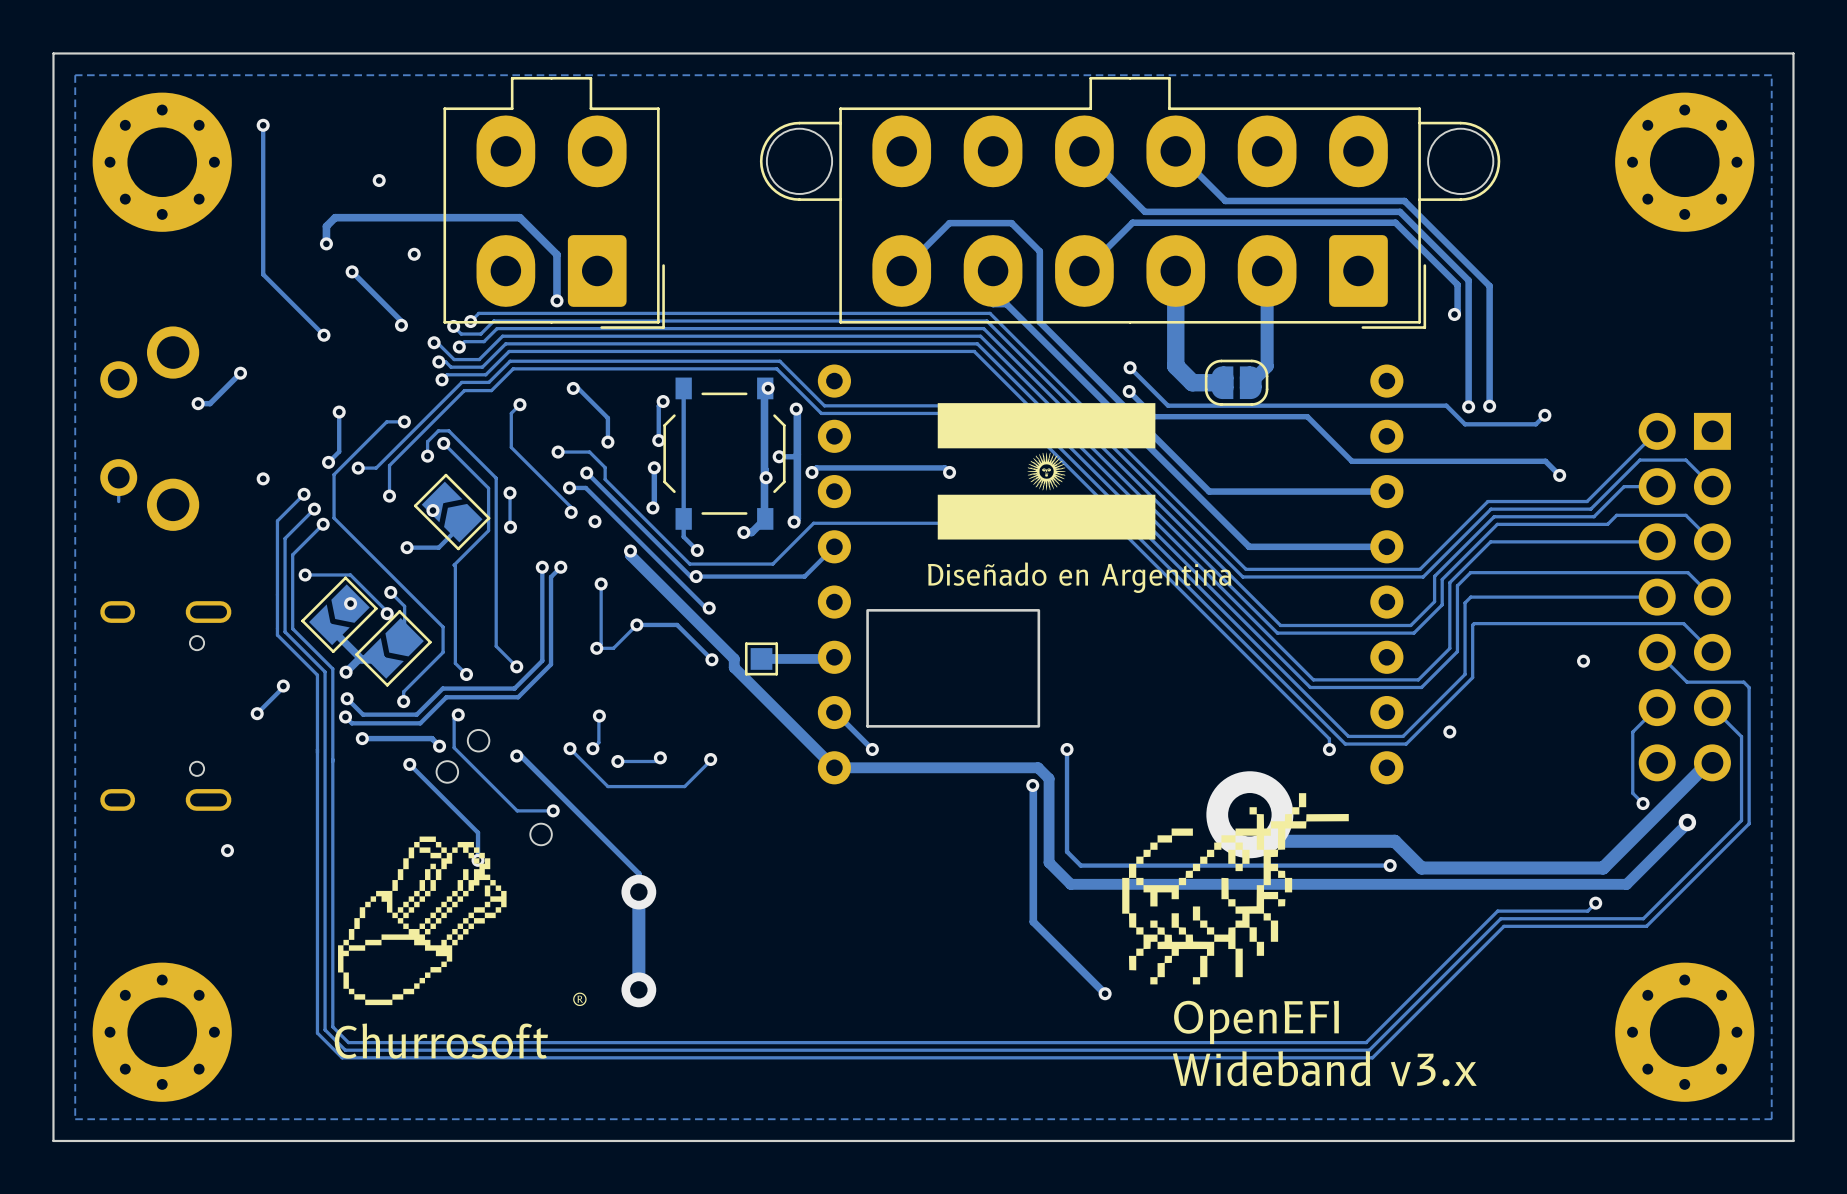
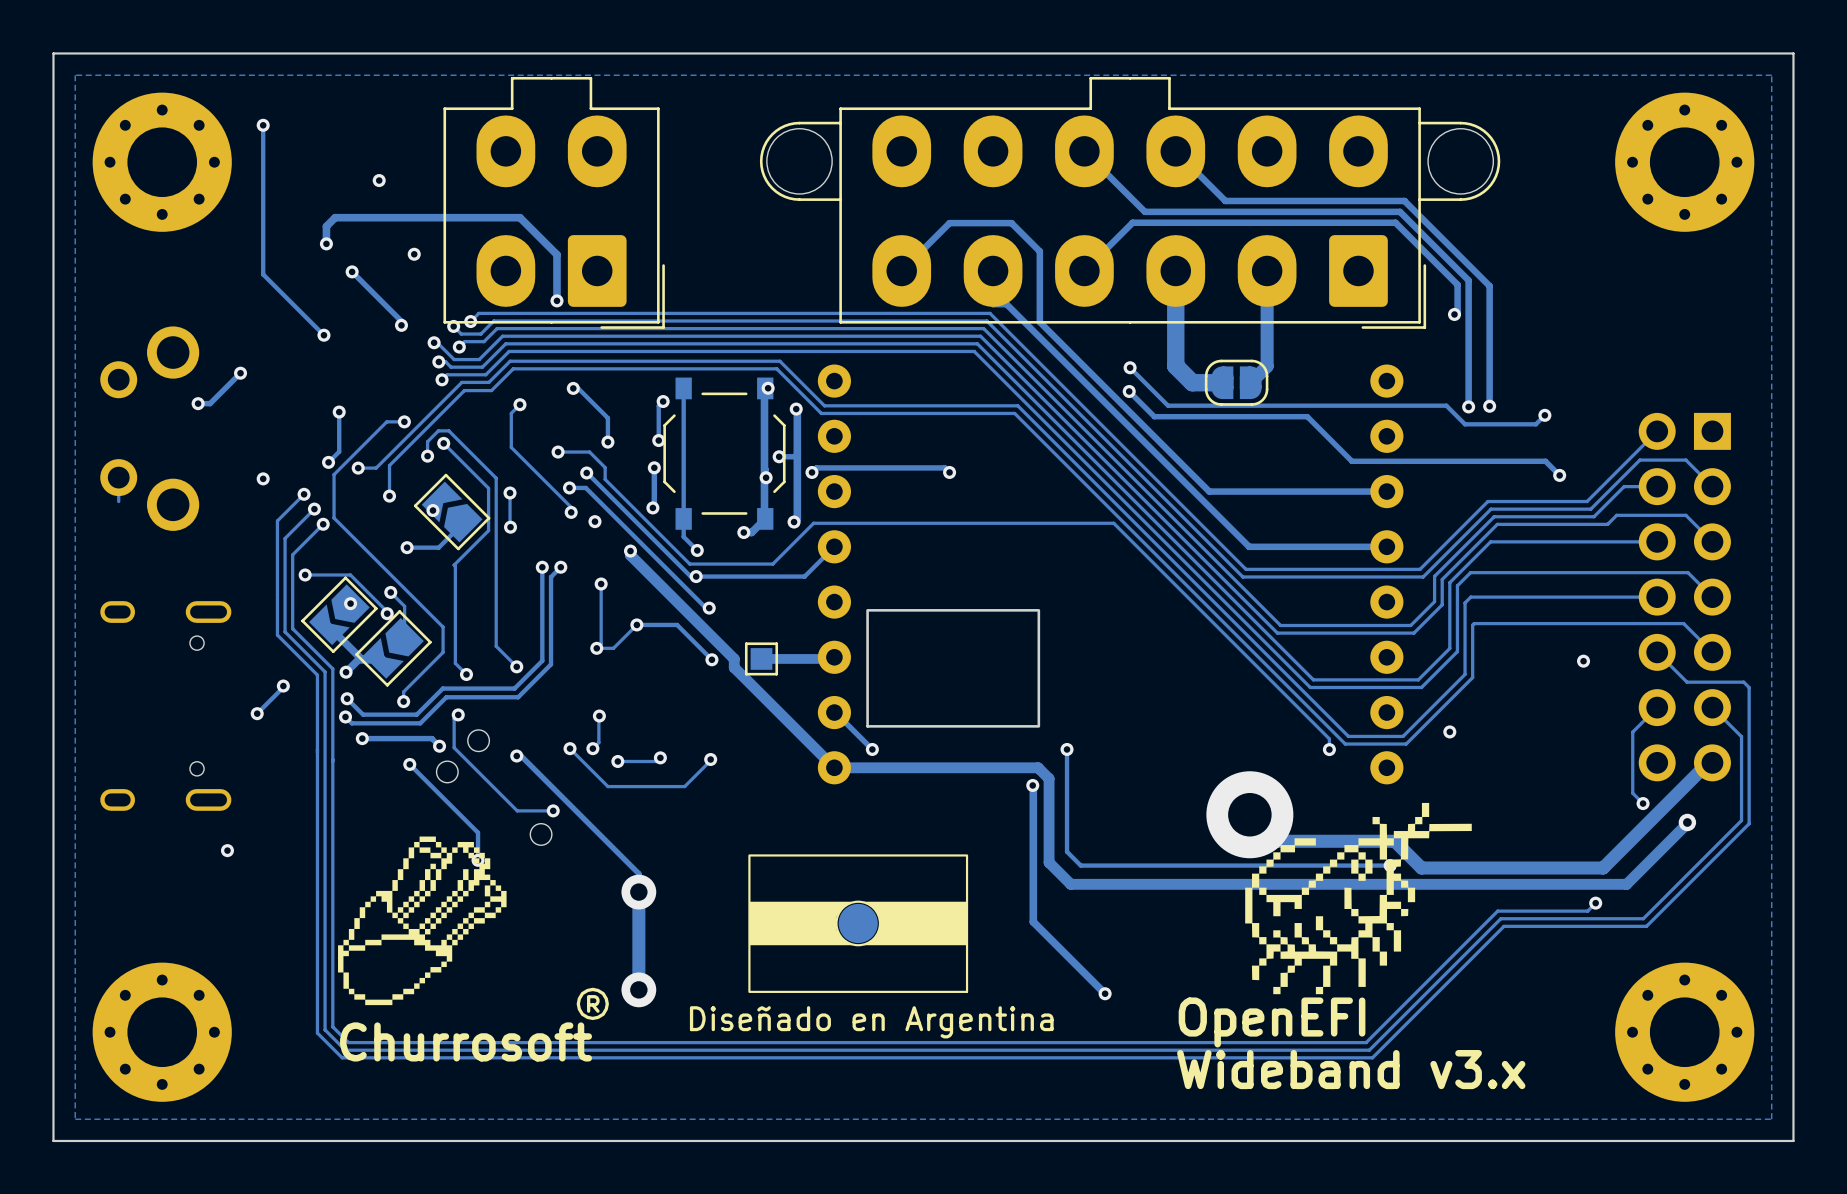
drawing: [937, 403, 1156, 540] -> none
text position: Diseñado en Argentina (1079, 577) -> Diseñado en Argentina (871, 1022)
drawing position: (1235, 888) -> (1358, 898)
part: none -> (858, 923)

